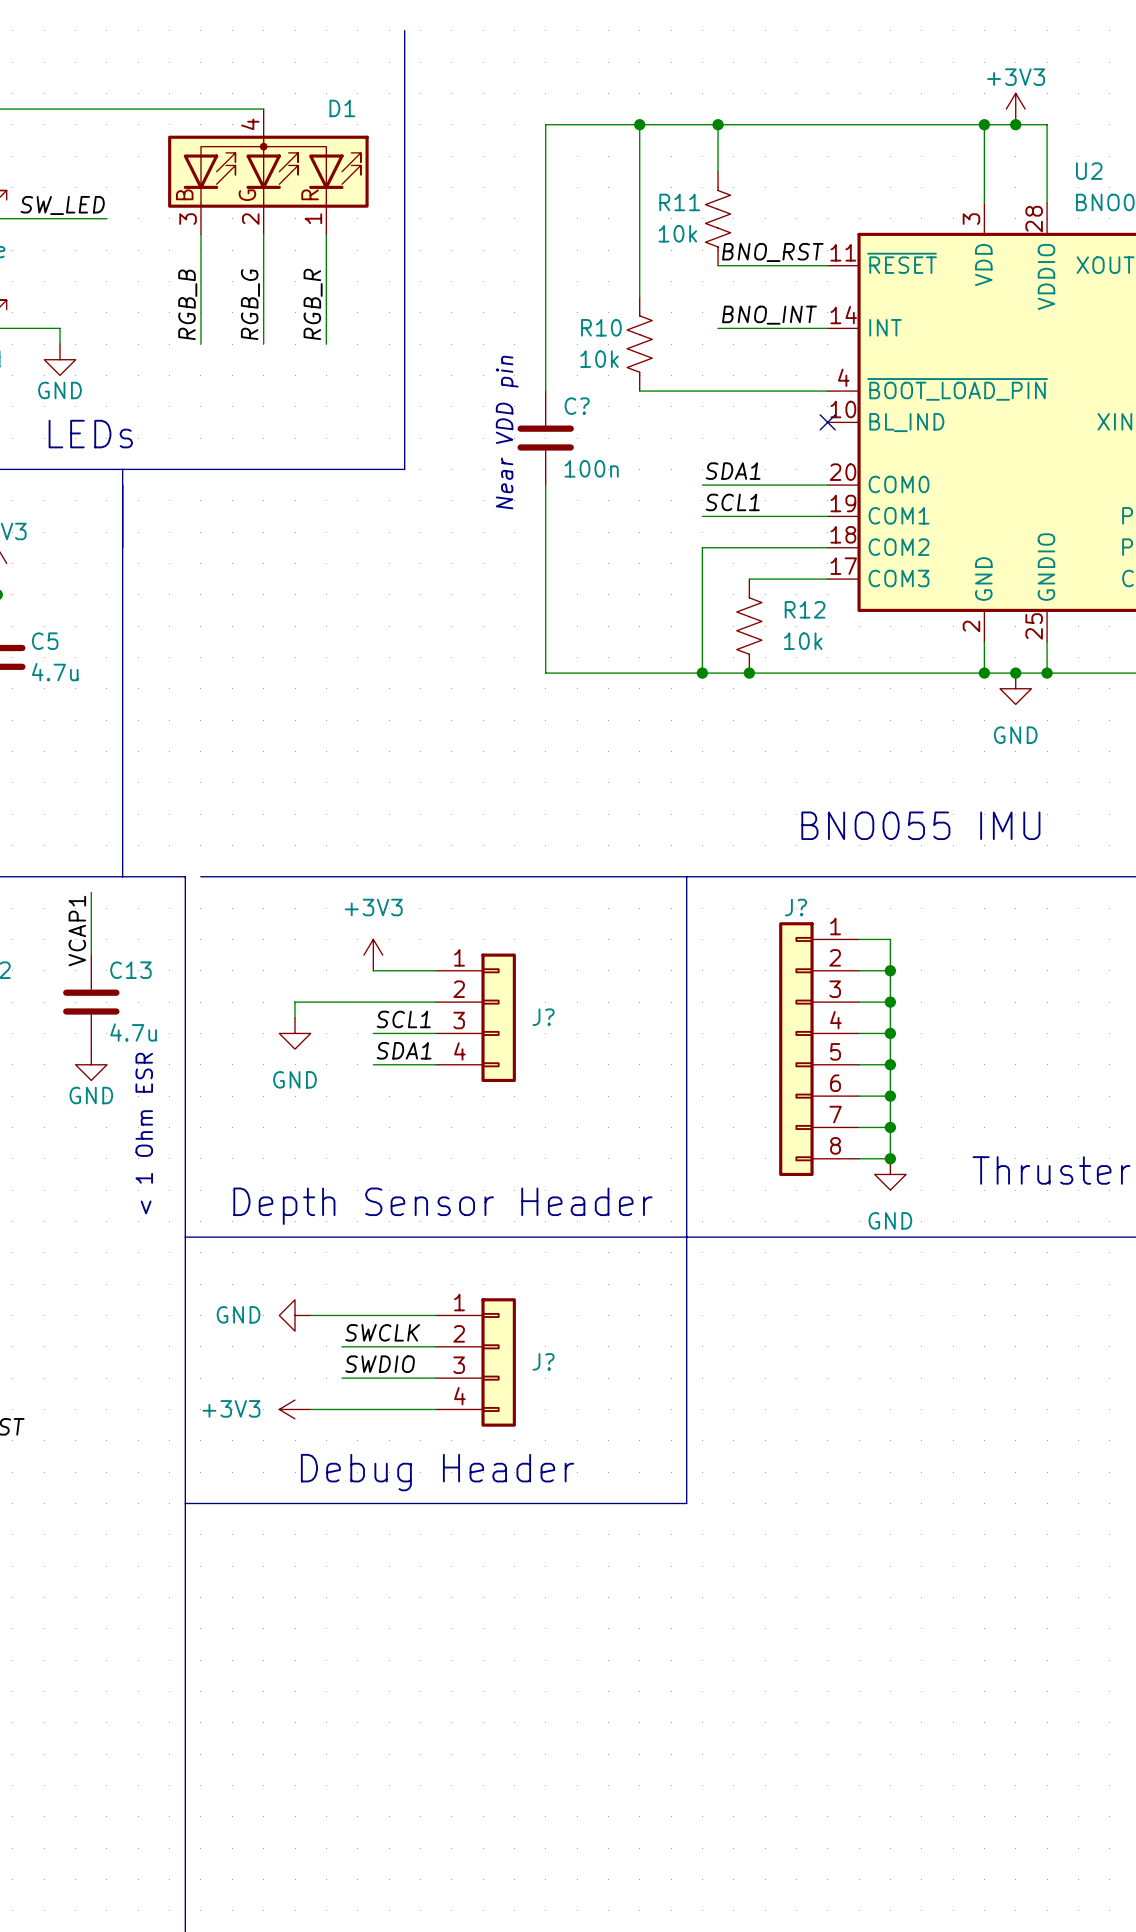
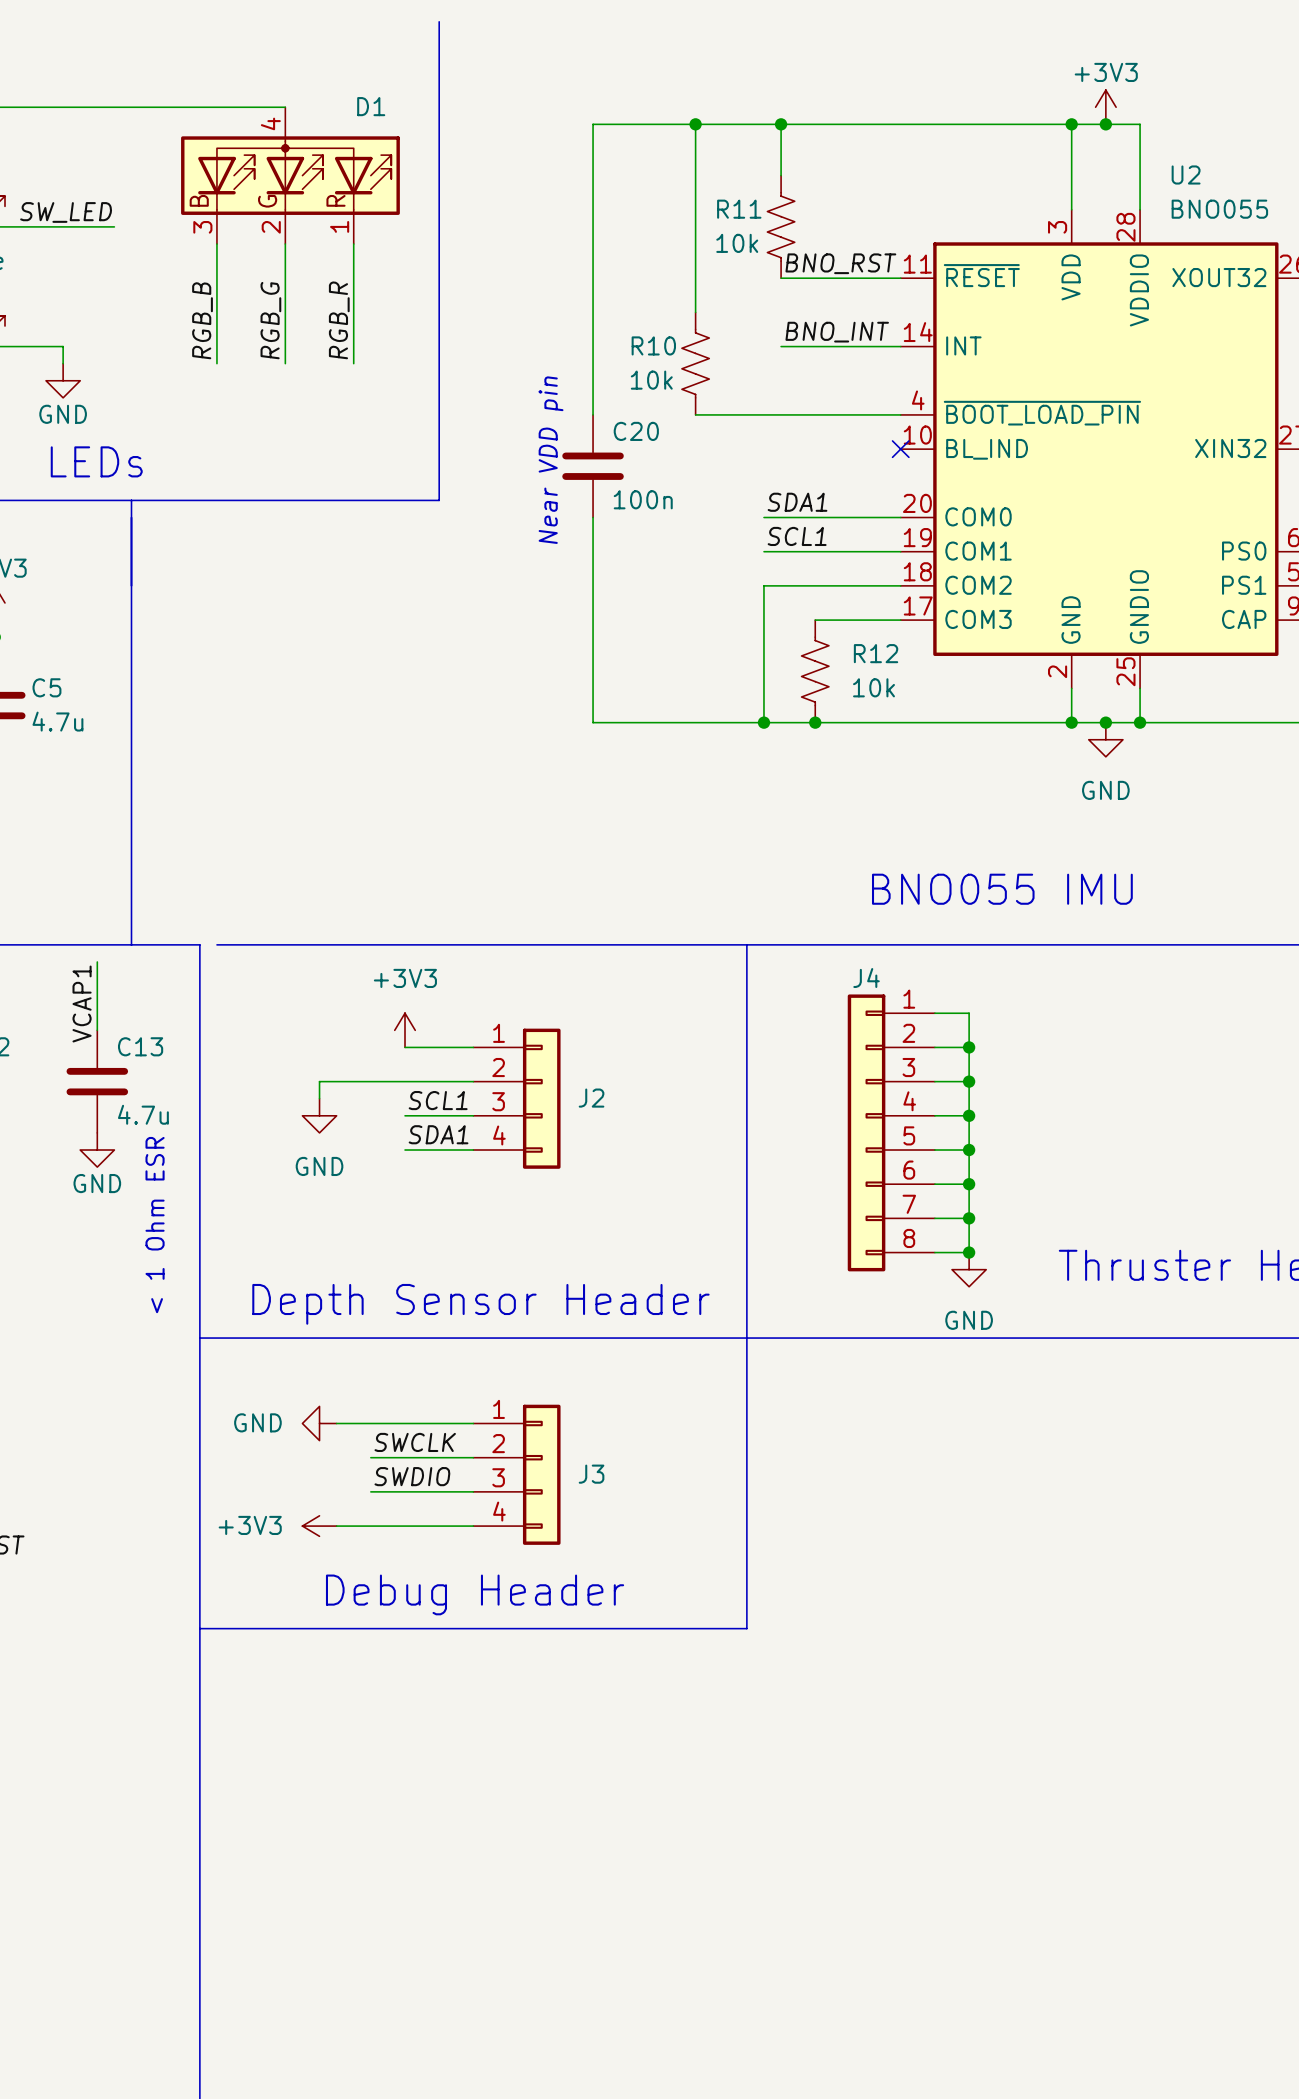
C? name: C? (577, 406) -> C20 (636, 431)
J? name: J? (796, 907) -> J4 (866, 978)
J? name: J? (543, 1017) -> J2 (591, 1098)
J? name: J? (543, 1361) -> J3 (591, 1474)

